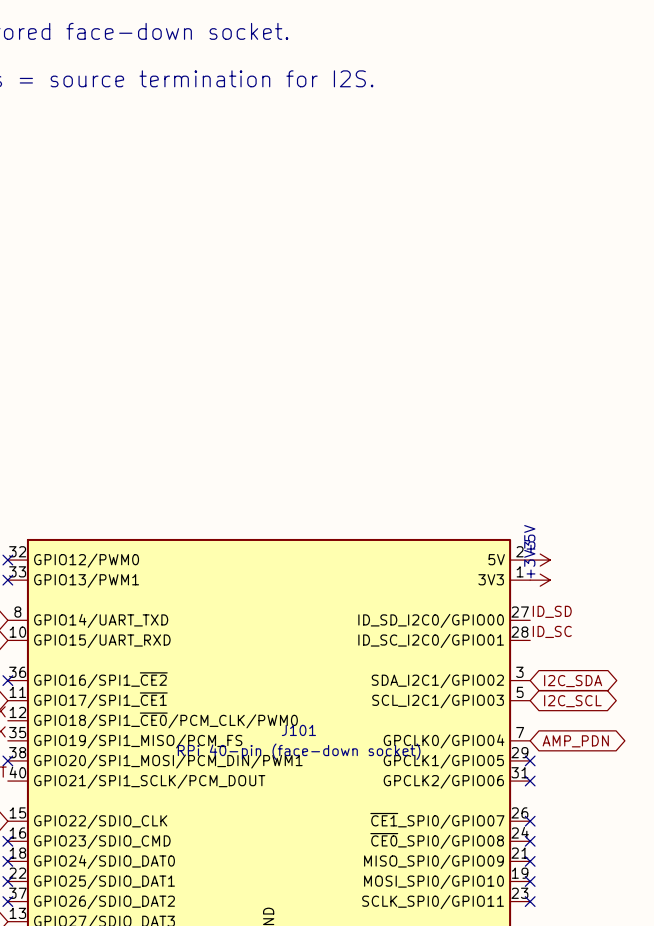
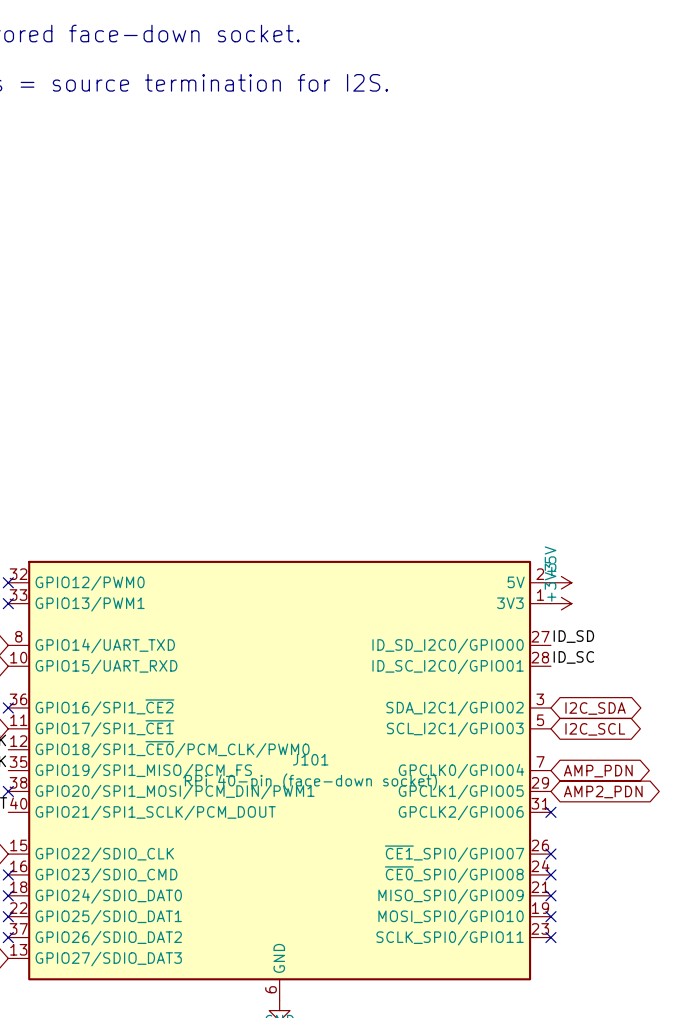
no-connect mark: (530, 760) -> none
global label: none -> AMP2_PDN (603, 791)

